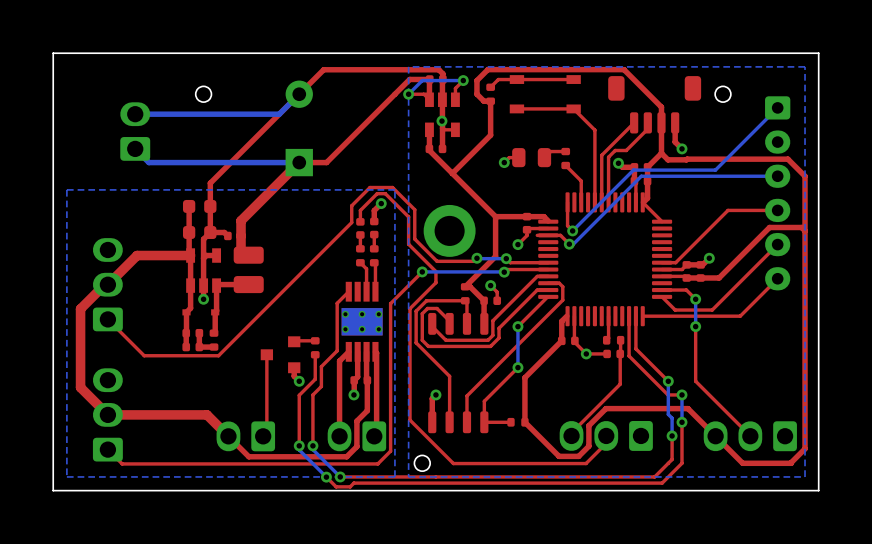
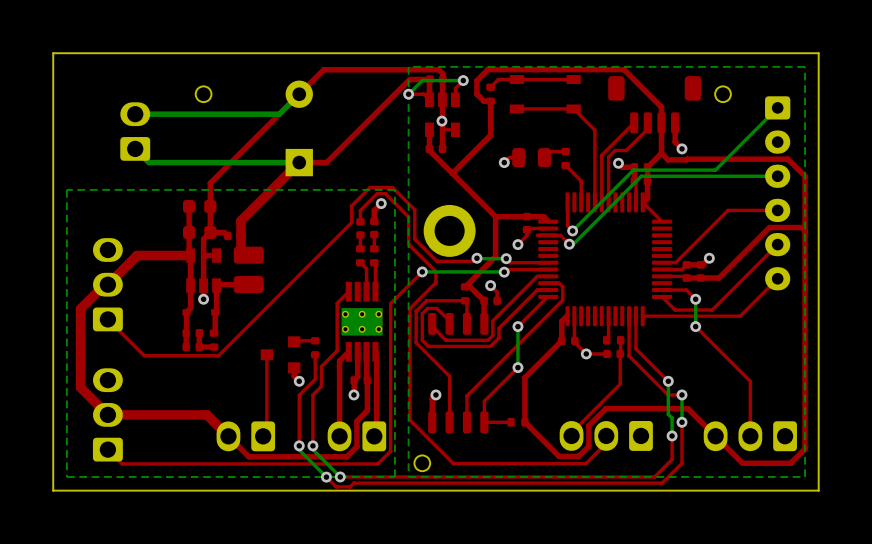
top track: (695, 326) (695, 381) (750, 435) -> (695, 326) (750, 381) (750, 435)

